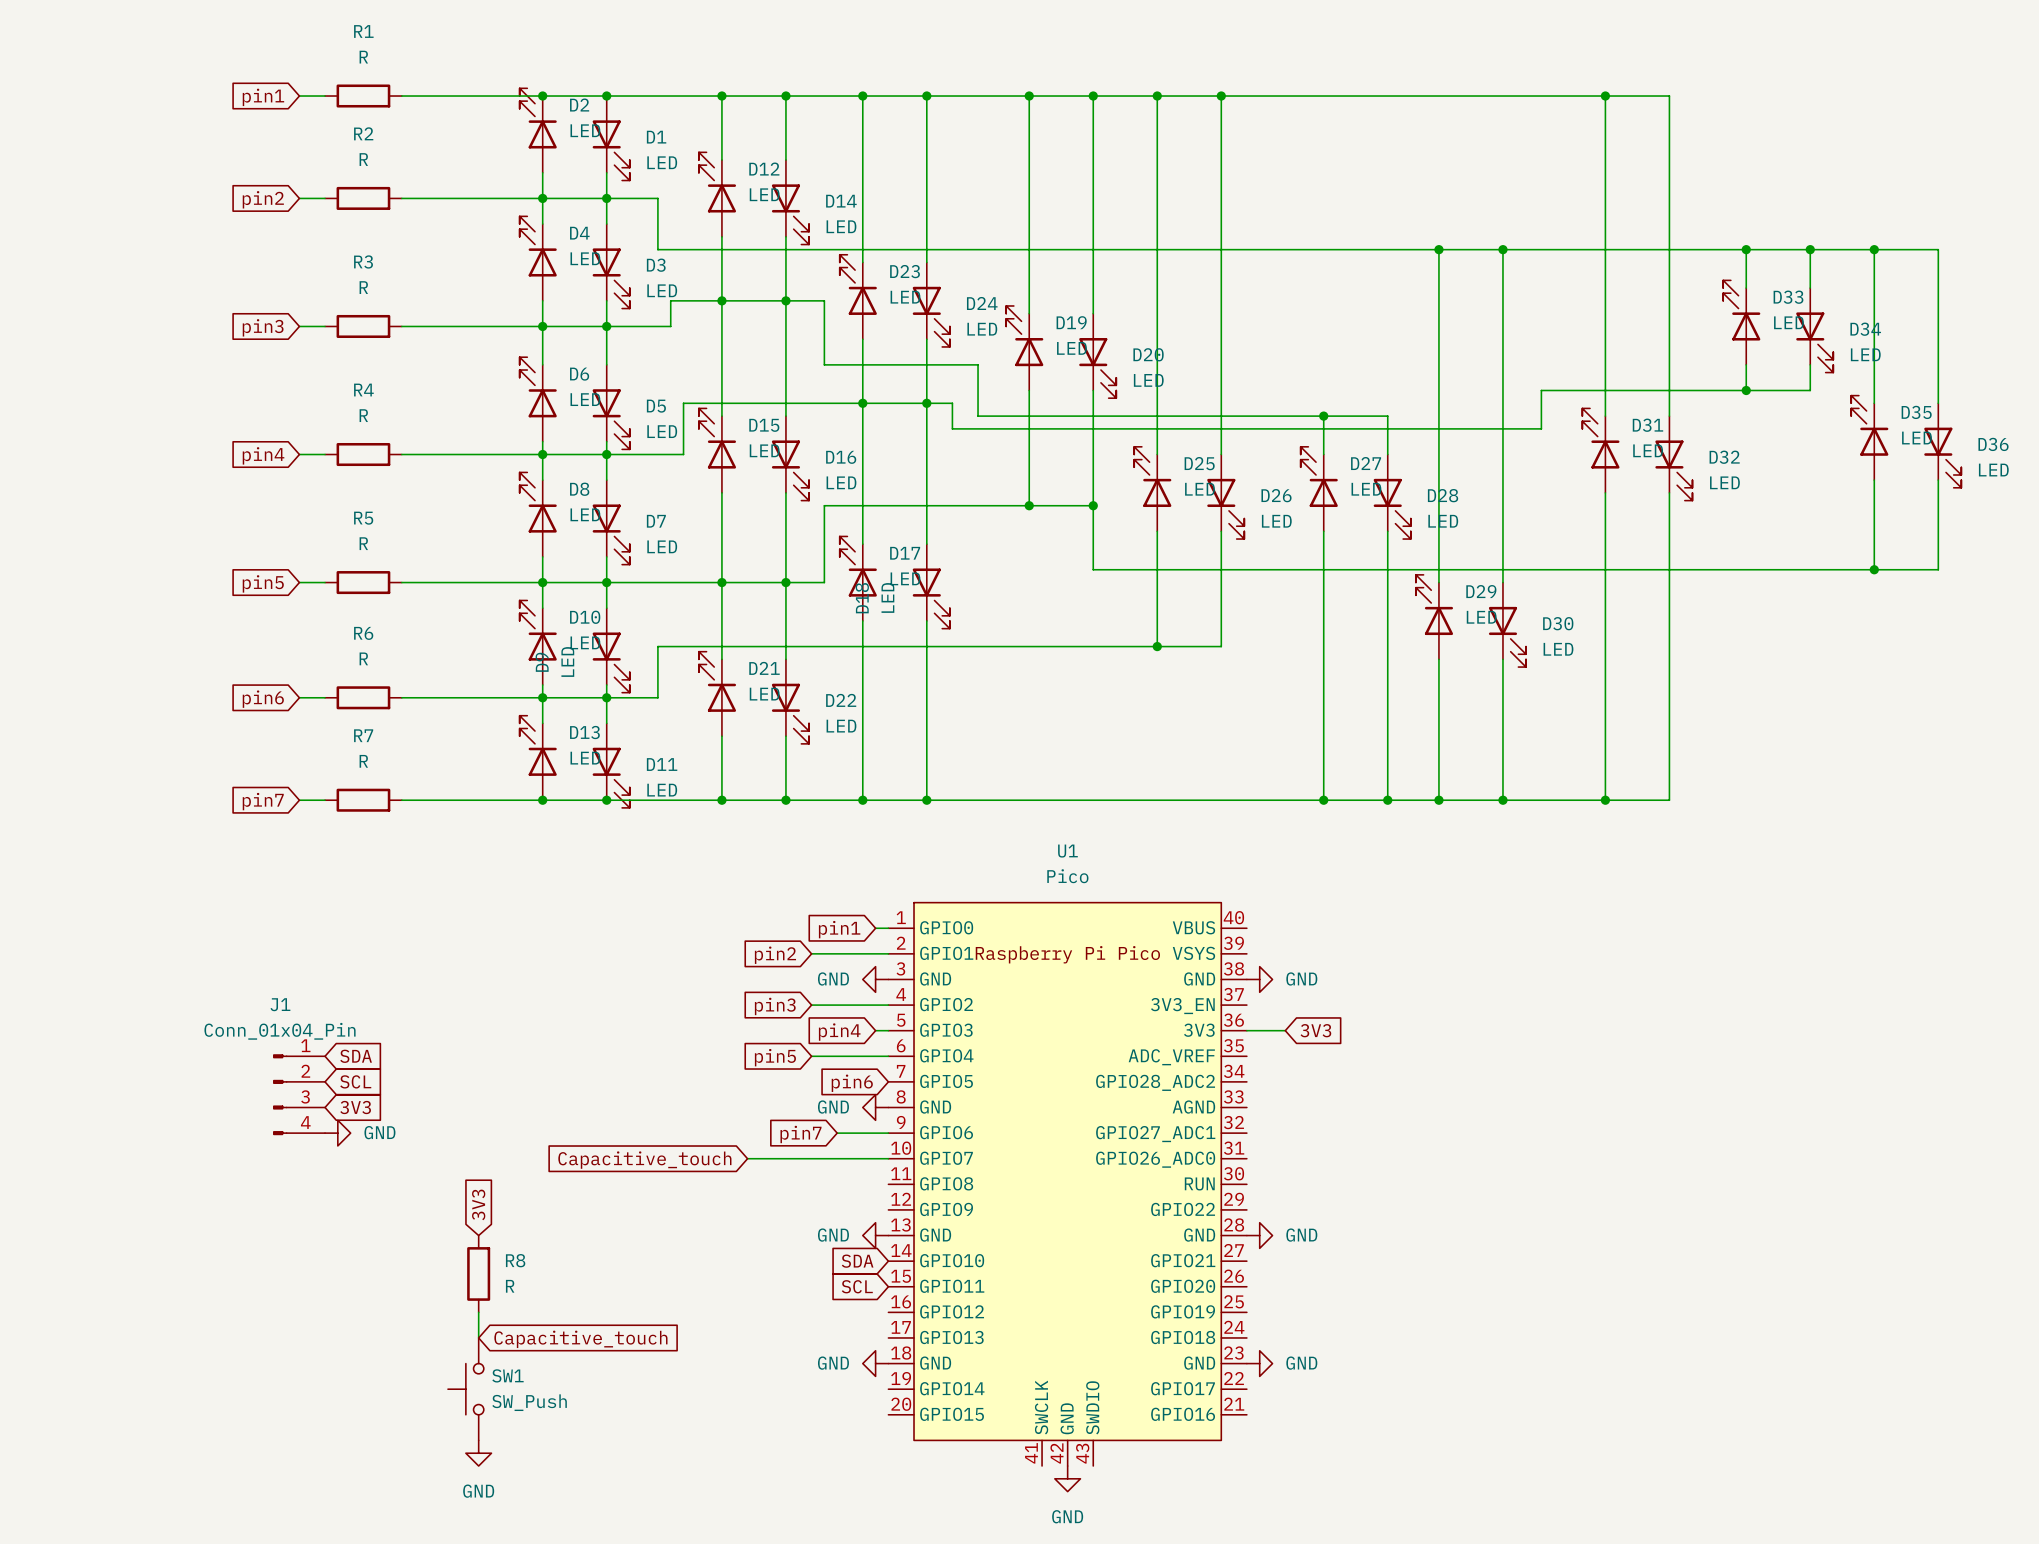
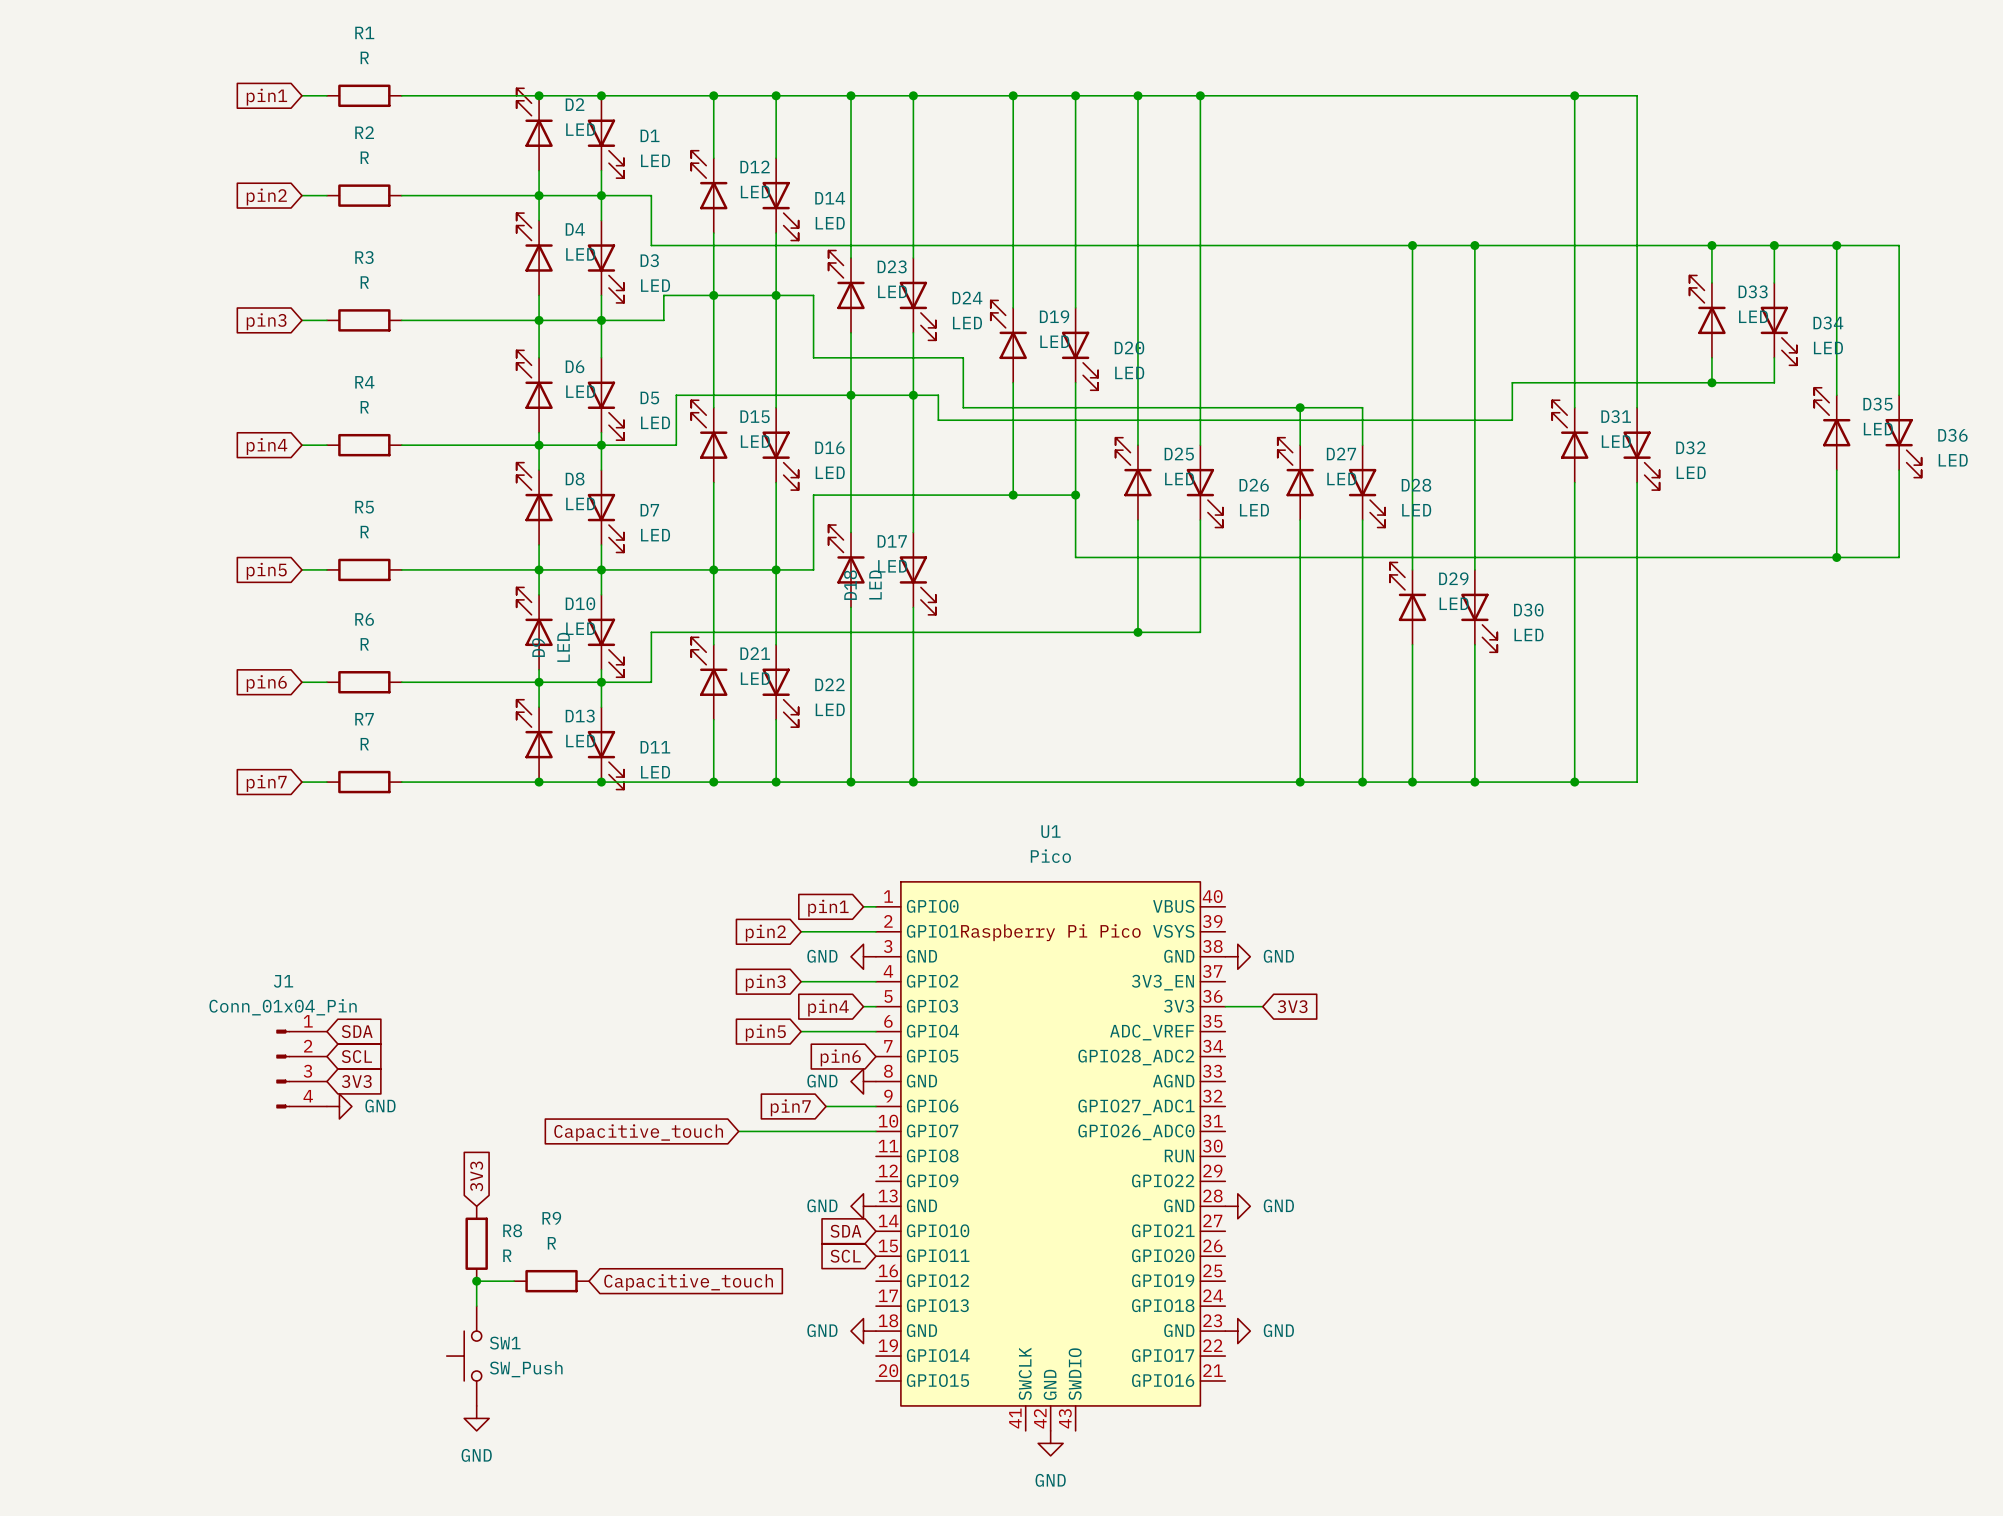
wire: none -> (476, 1281) (514, 1281)
junction: none -> (476, 1281)
R9: none -> R (551, 1281)
global label position: Capacitive_touch (580, 1339) -> Capacitive_touch (688, 1282)

